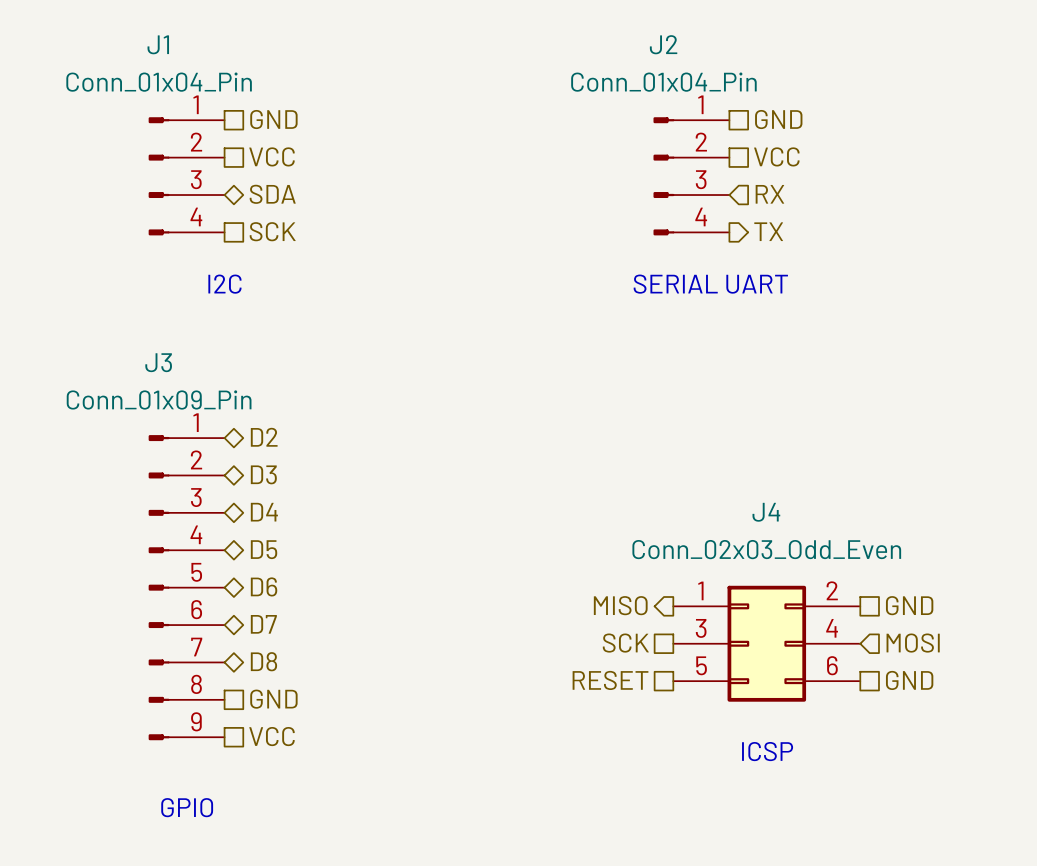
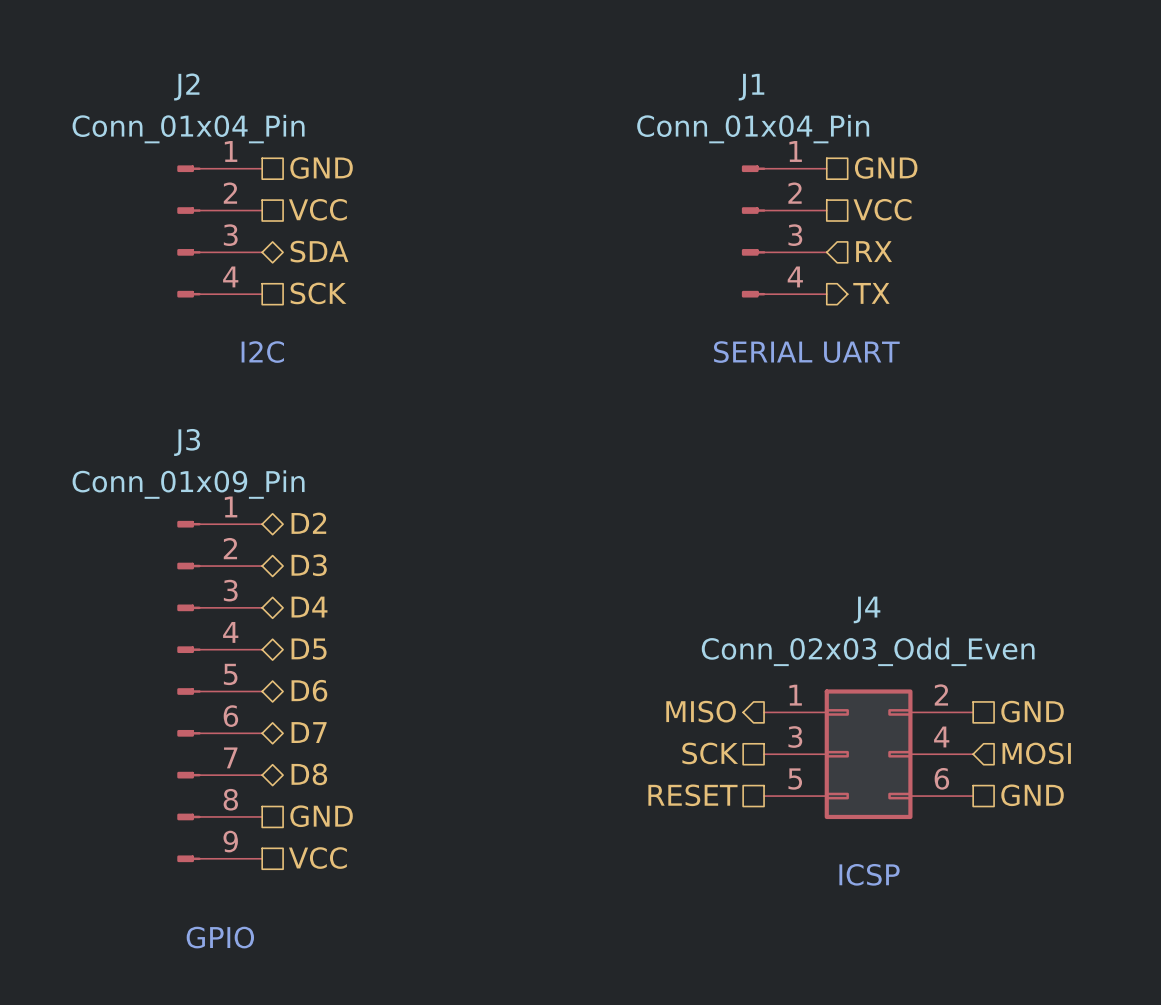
J1 name: J1 (158, 44) -> J2 (186, 86)
J2 name: J2 (663, 44) -> J1 (751, 87)

